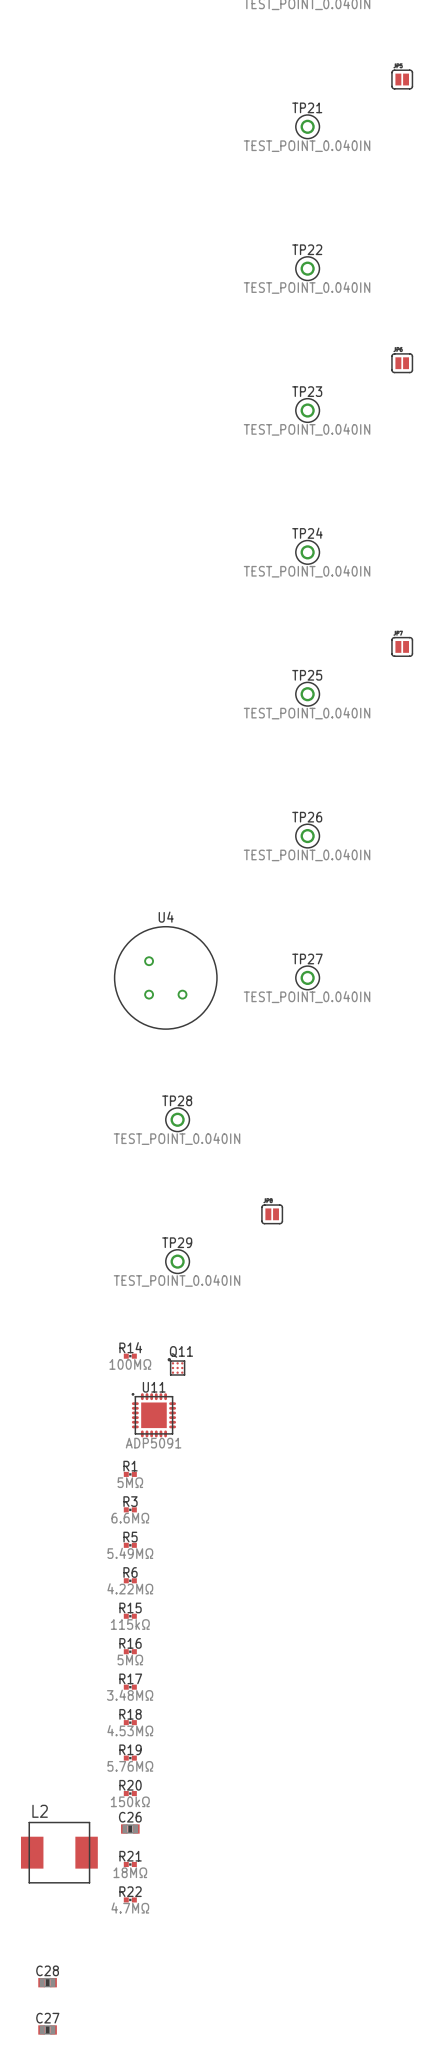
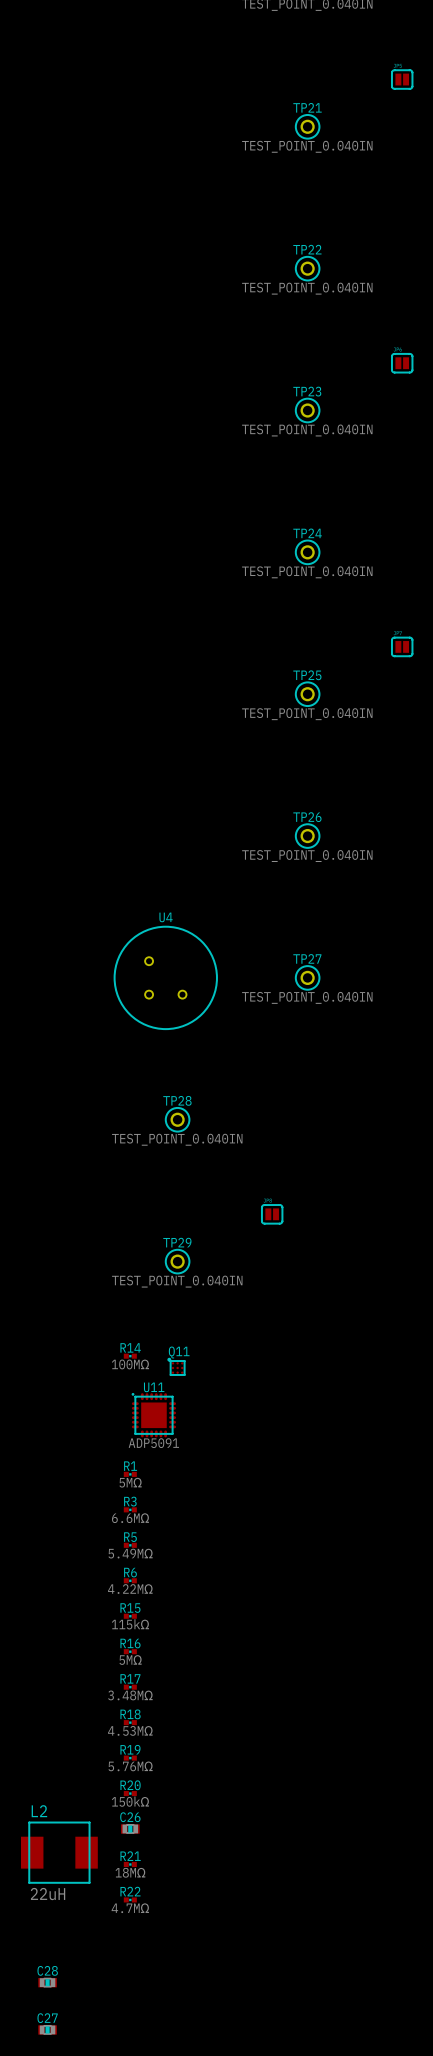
L2 value: none -> 22uH (48, 1894)

